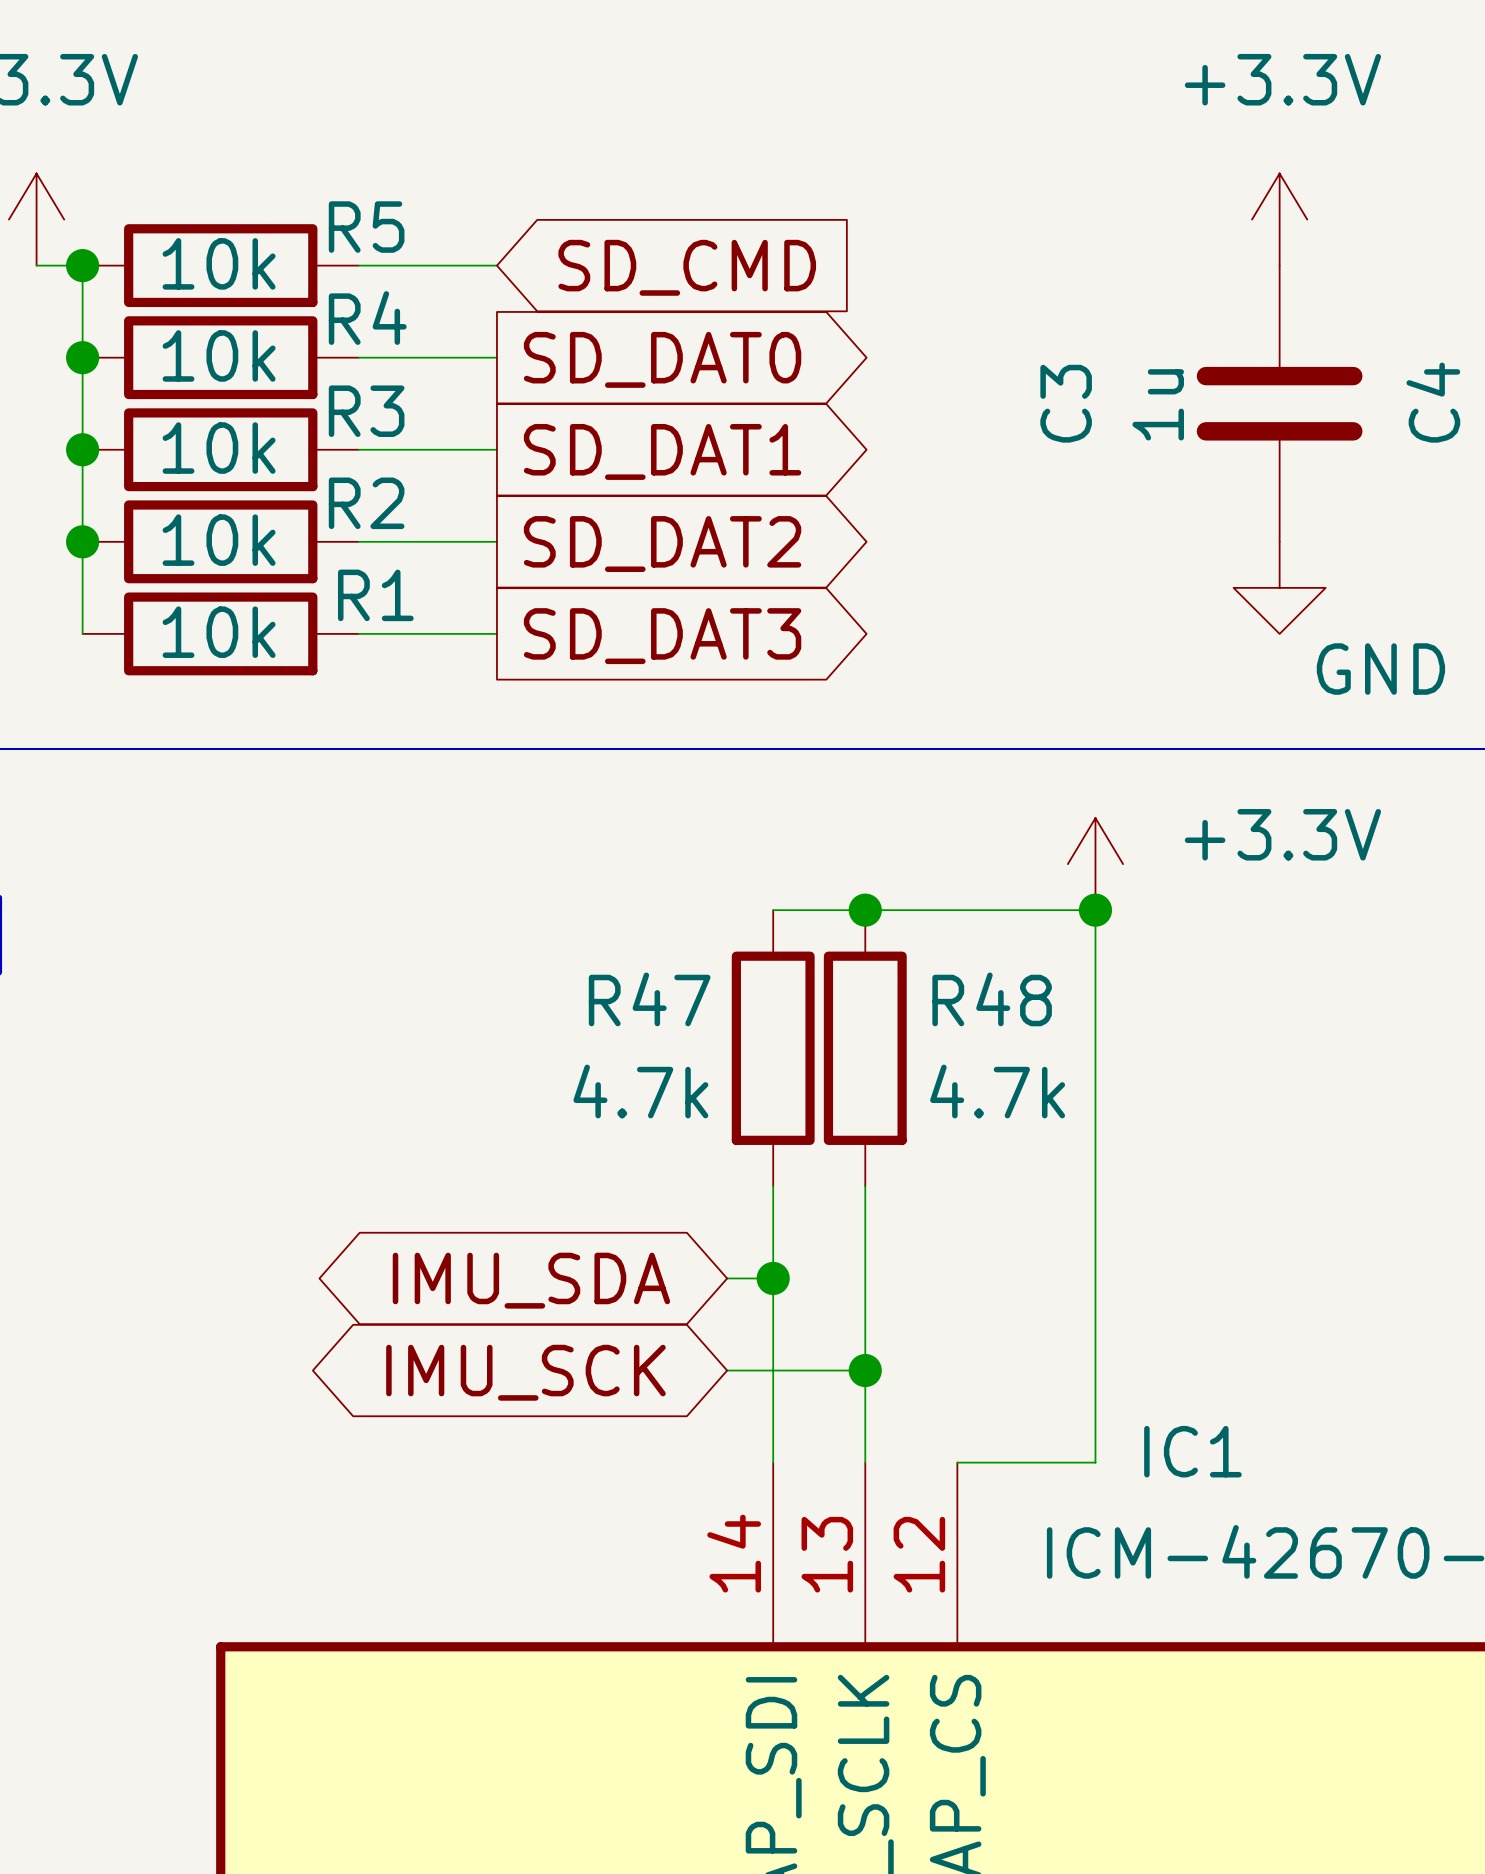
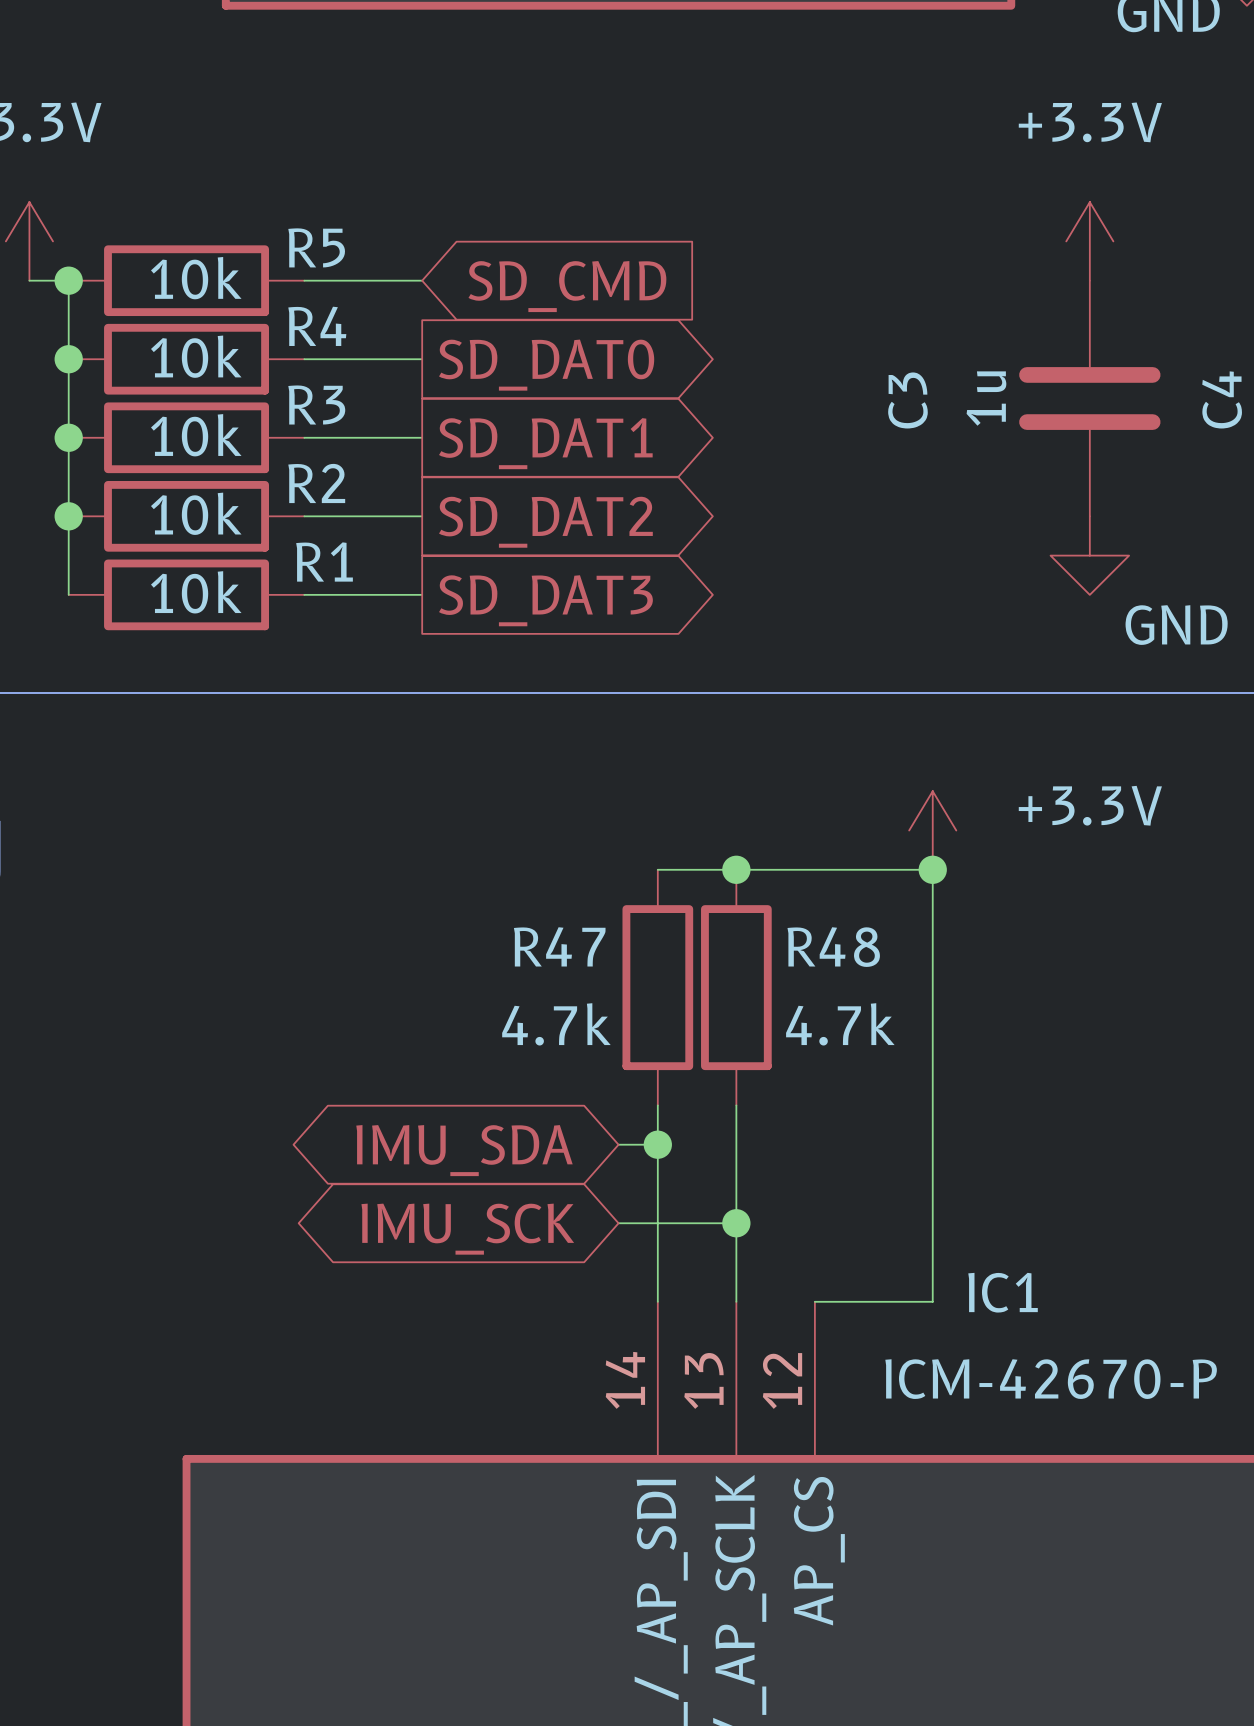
power symbol position: +3.3V (1095, 864) -> +3.3V (932, 830)
wire: (773, 910) (1095, 910) (1095, 956) -> (657, 869) (932, 869)
junction position: (865, 910) -> (736, 869)
junction position: (1095, 910) -> (932, 869)
R47 position: (773, 1048) -> (657, 987)
R48 position: (865, 1048) -> (736, 987)

